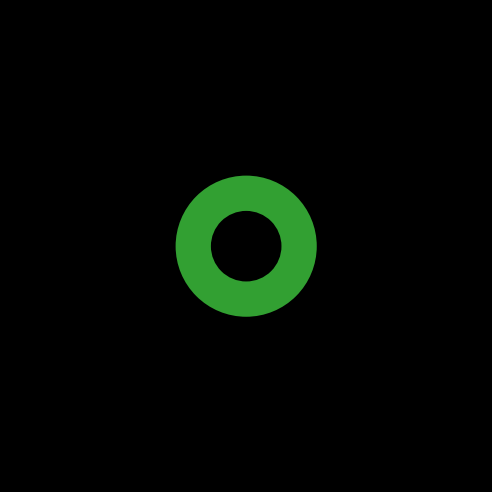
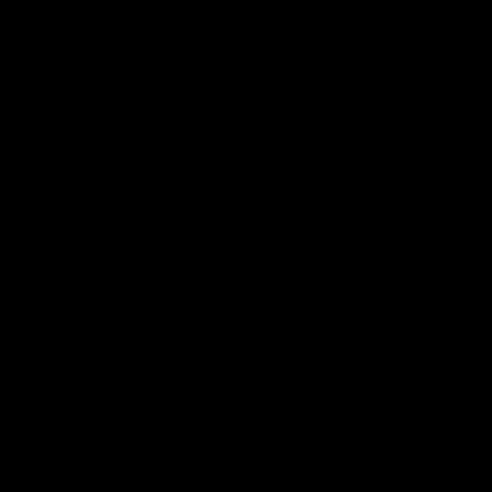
part: (246, 246) -> none

